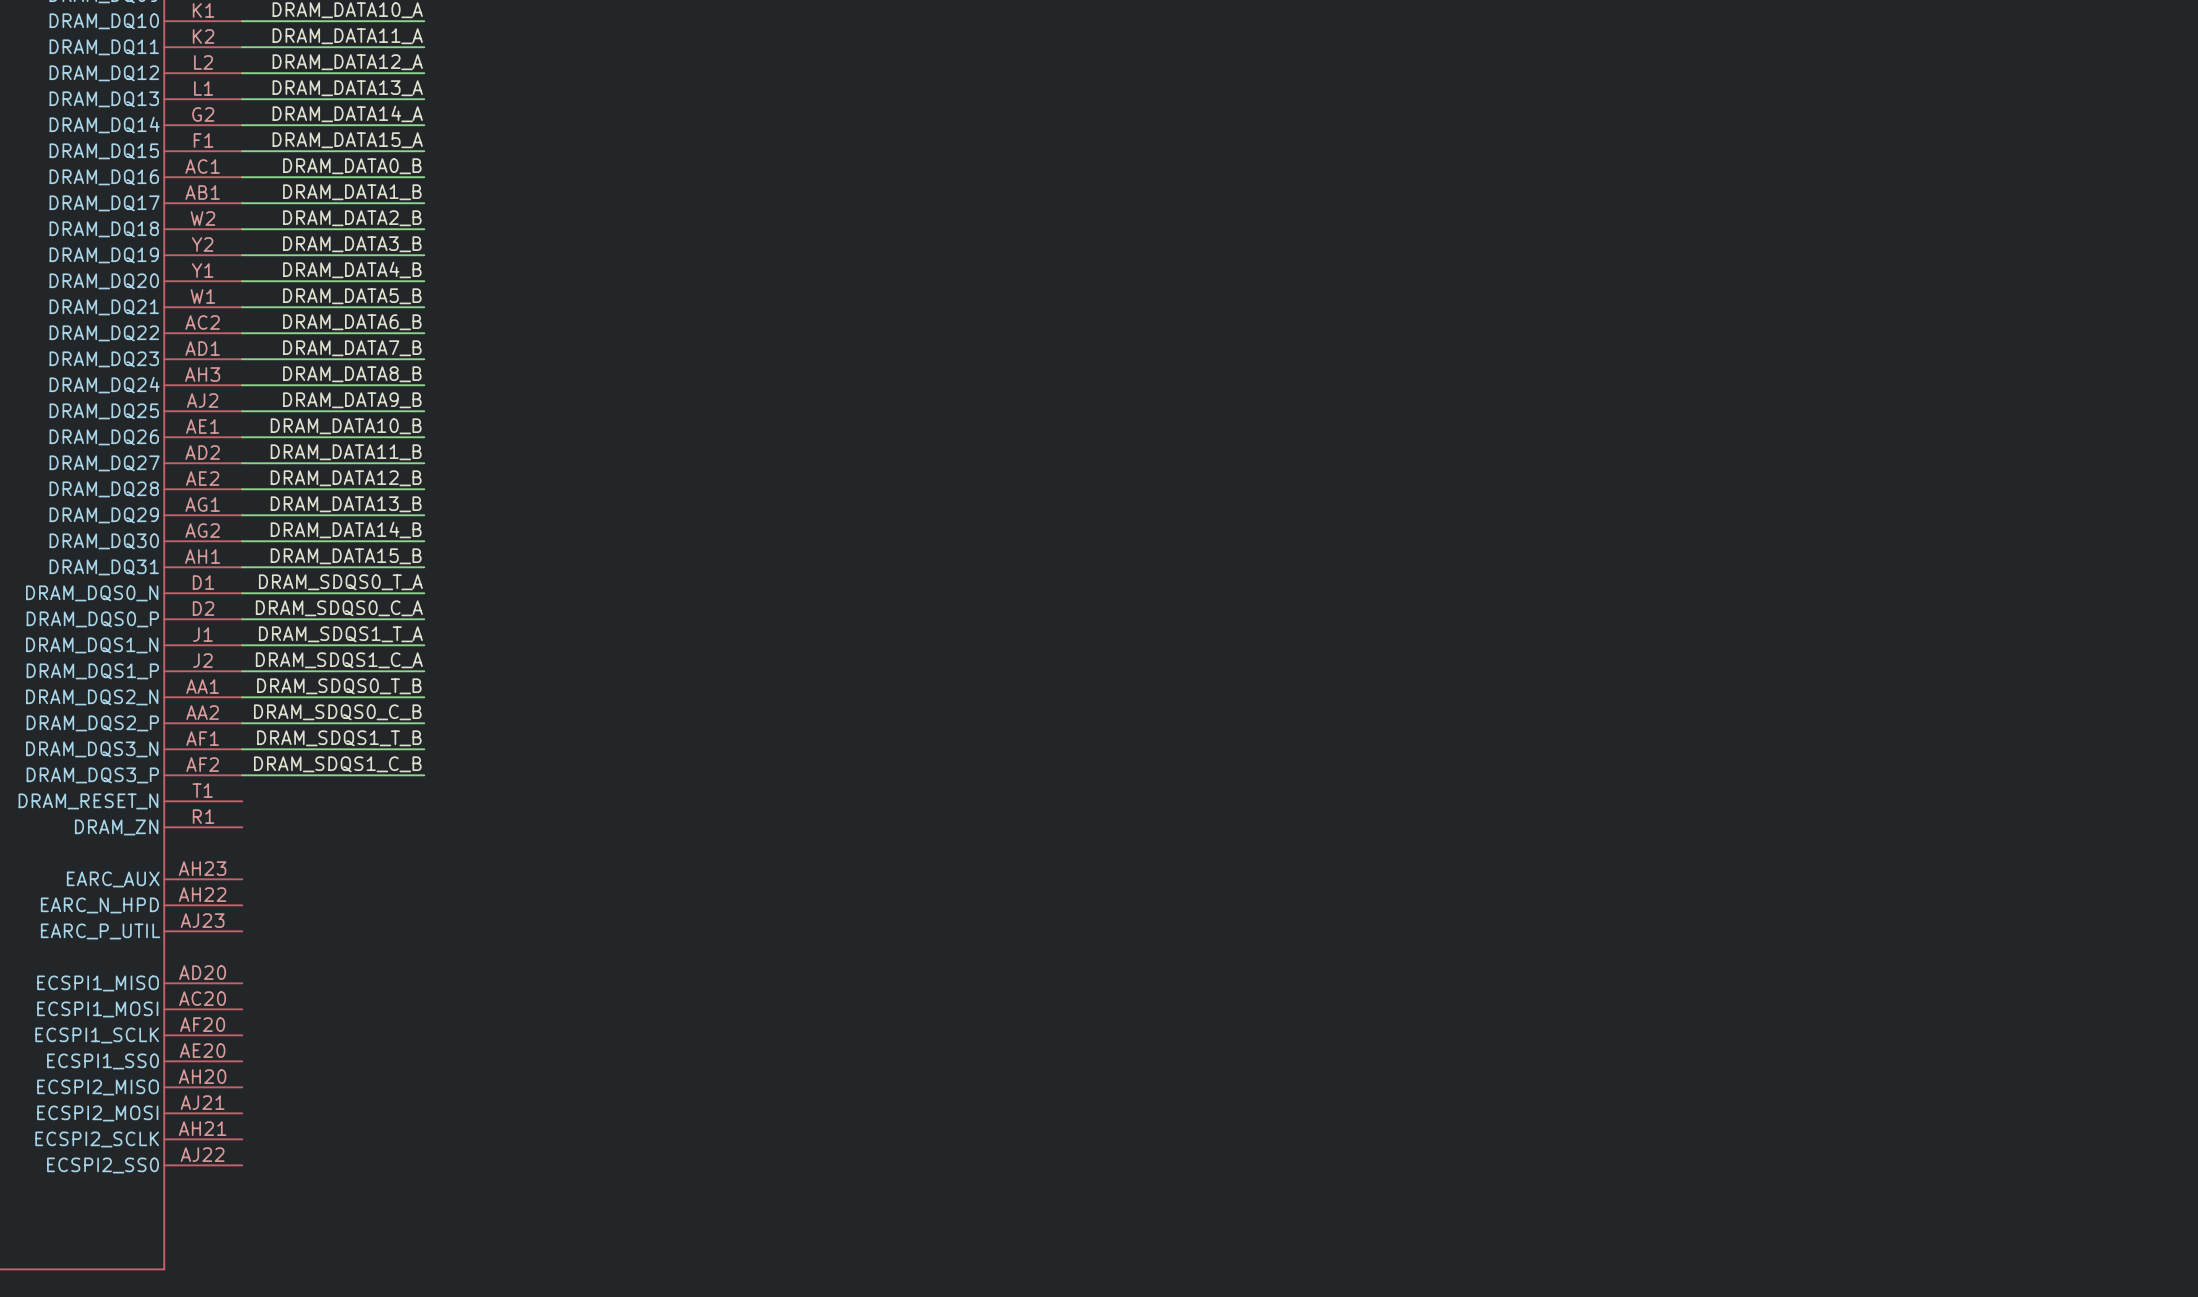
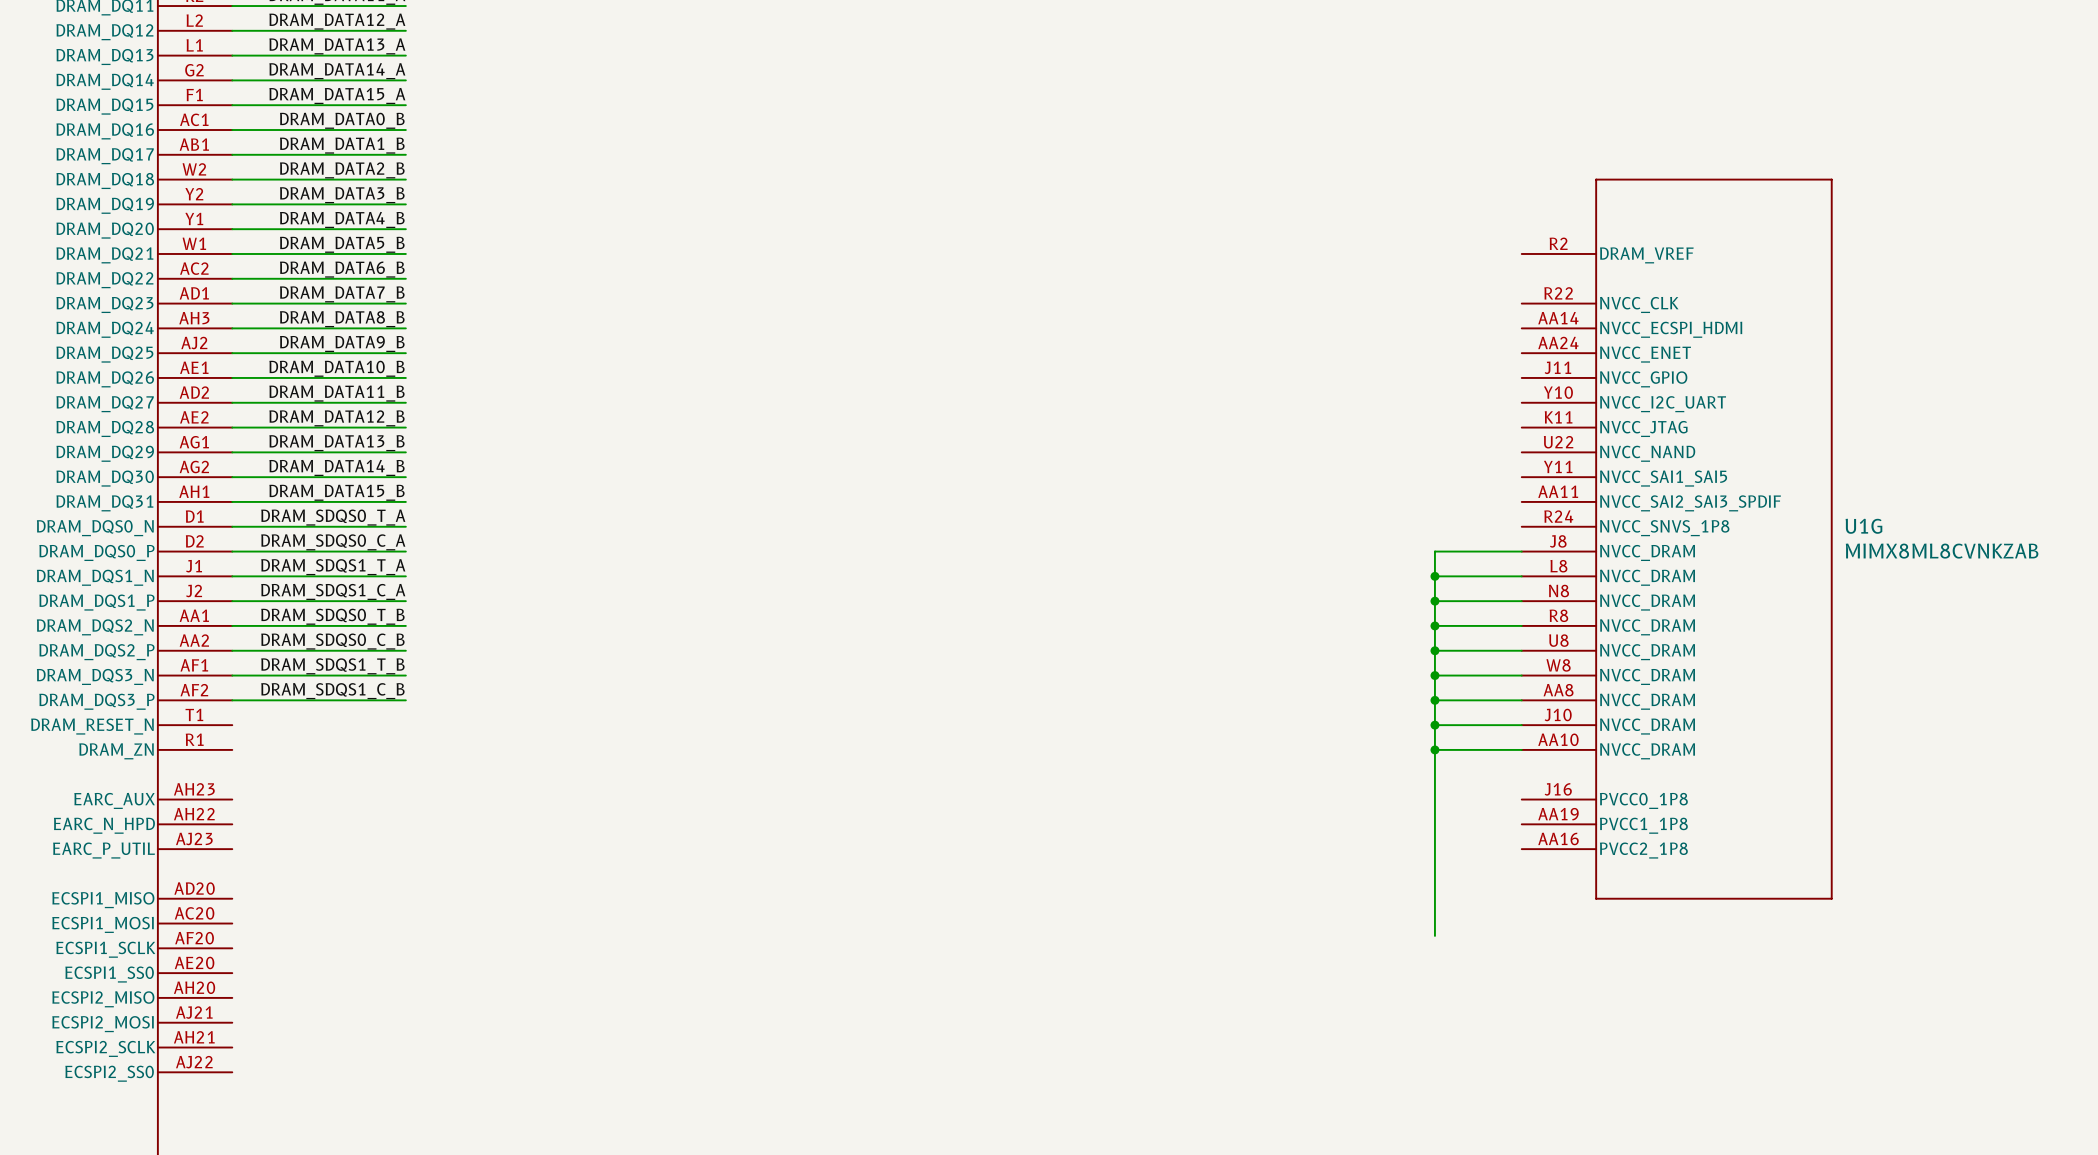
U1G: none -> MIMX8ML8CVNKZAB (1677, 539)
wire: none -> (1521, 551) (1434, 551) (1434, 935)
wire: none -> (1434, 576) (1521, 576)
junction: none -> (1434, 576)
wire: none -> (1434, 601) (1521, 601)
junction: none -> (1434, 601)
wire: none -> (1434, 625) (1521, 625)
junction: none -> (1434, 625)
wire: none -> (1434, 650) (1521, 650)
junction: none -> (1434, 650)
wire: none -> (1434, 675) (1521, 675)
junction: none -> (1434, 675)
wire: none -> (1434, 700) (1521, 700)
junction: none -> (1434, 700)
wire: none -> (1434, 725) (1521, 725)
junction: none -> (1434, 725)
wire: none -> (1434, 749) (1521, 749)
junction: none -> (1434, 749)

